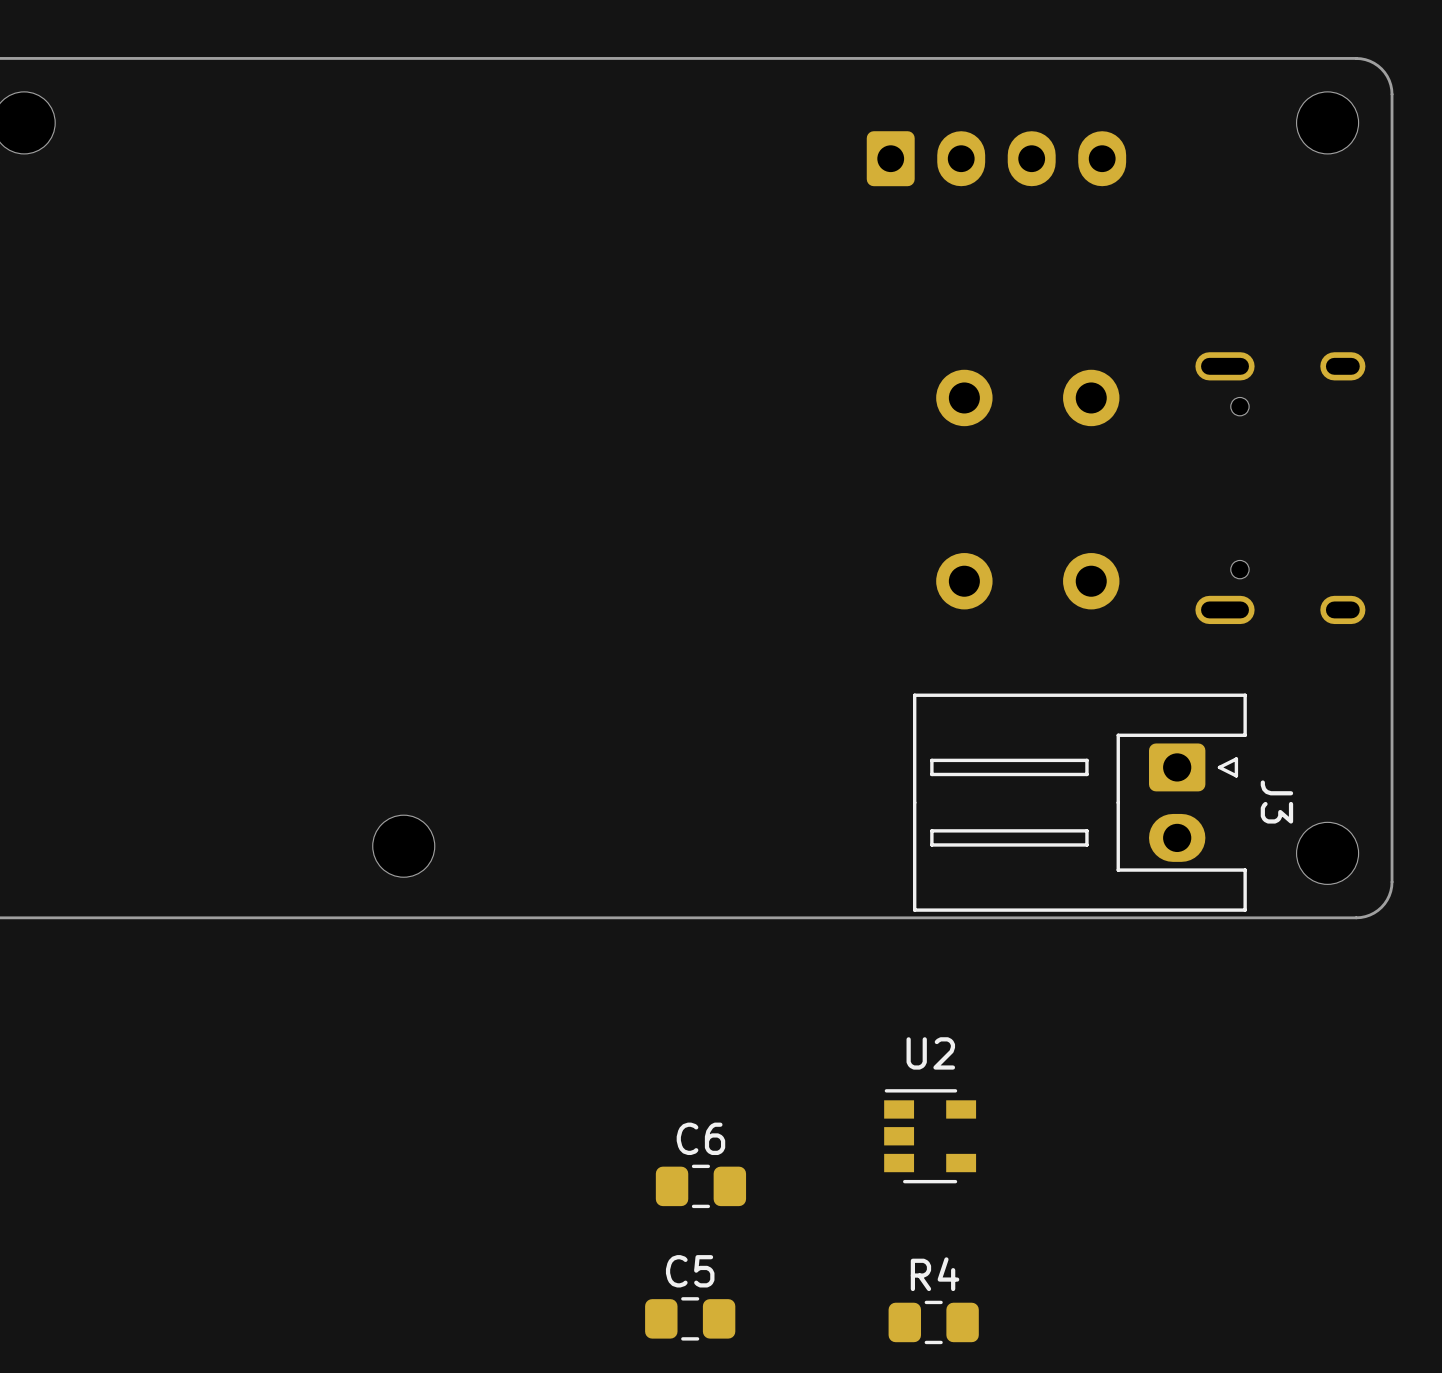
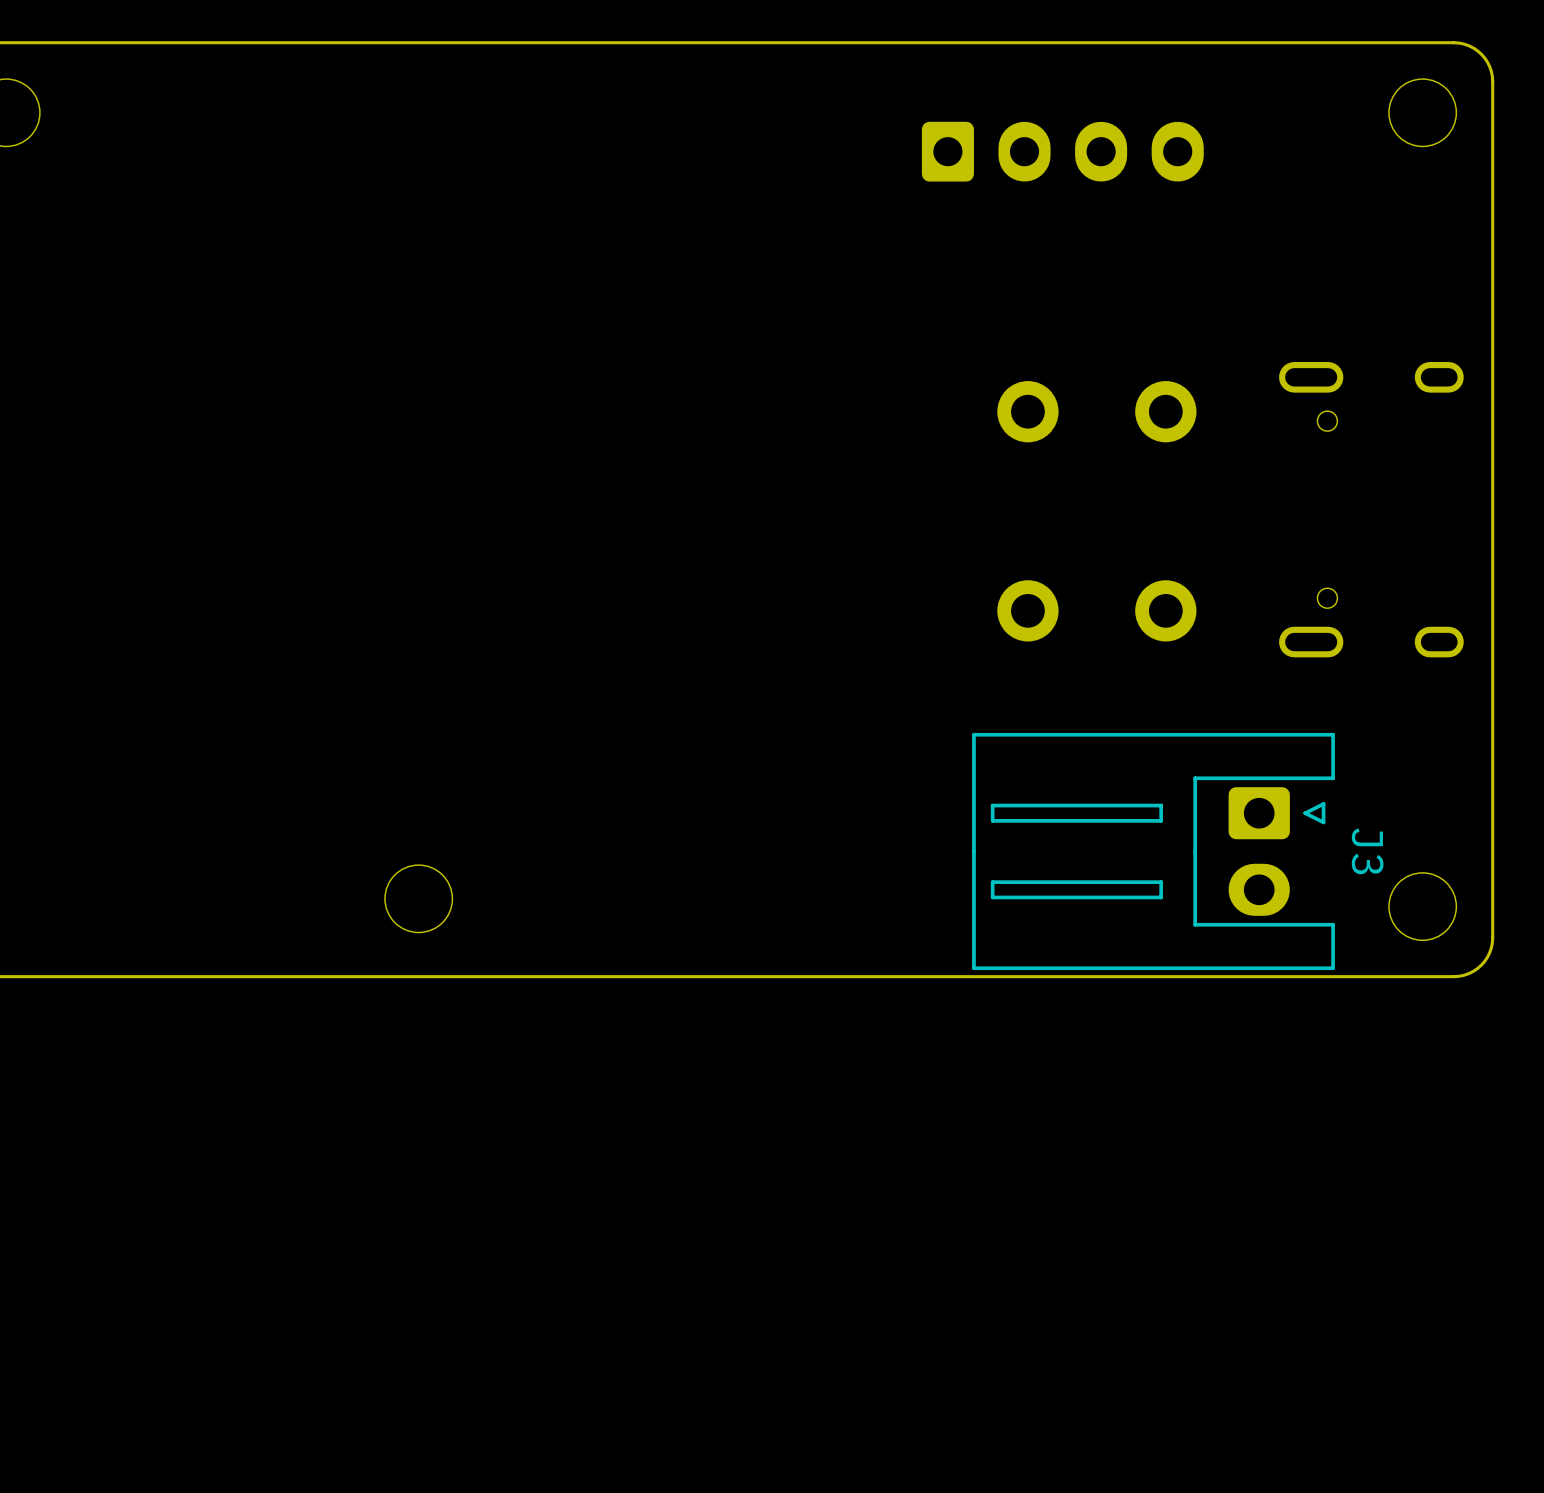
U2: (930, 1136) -> none
C6: (700, 1186) -> none
C5: (690, 1318) -> none
R4: (933, 1322) -> none

